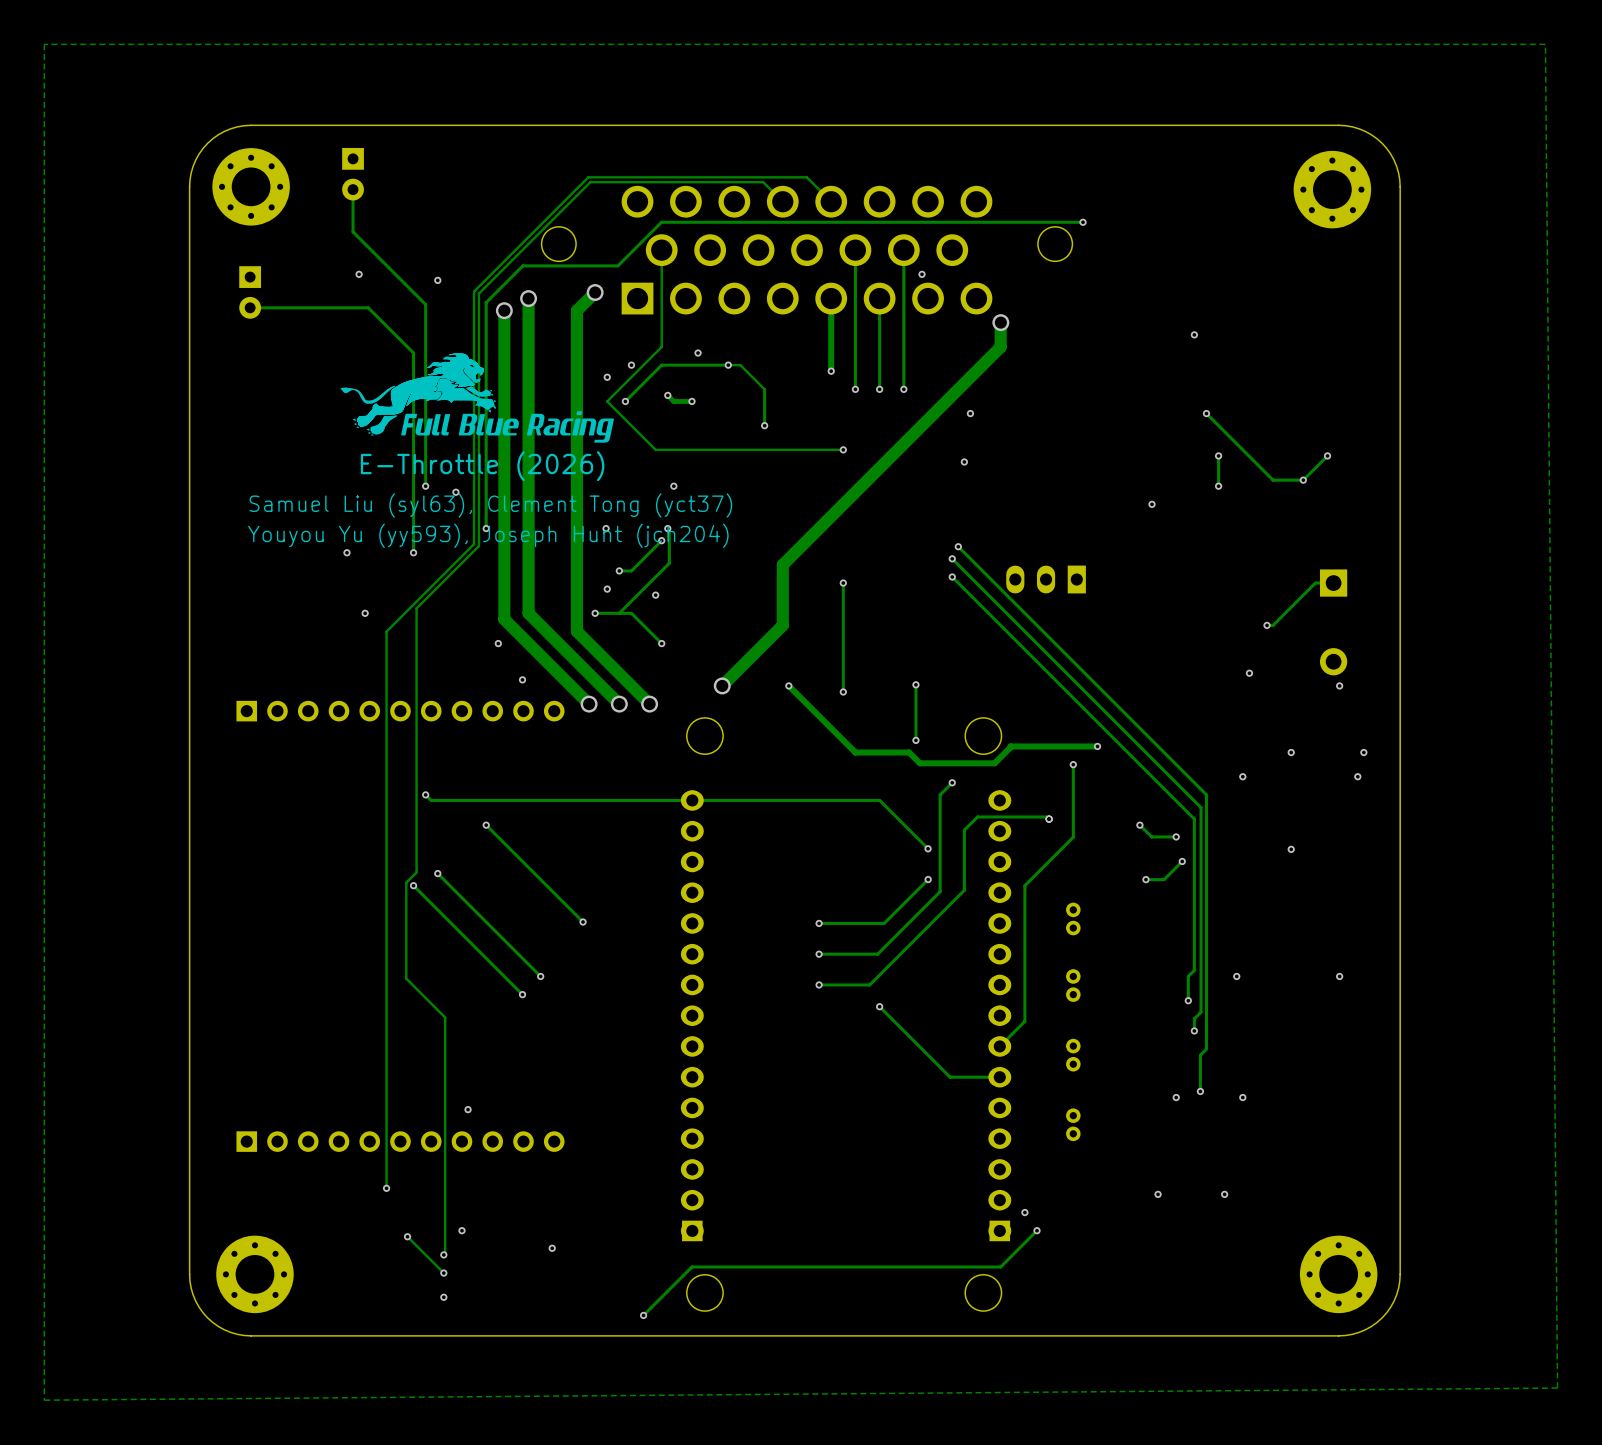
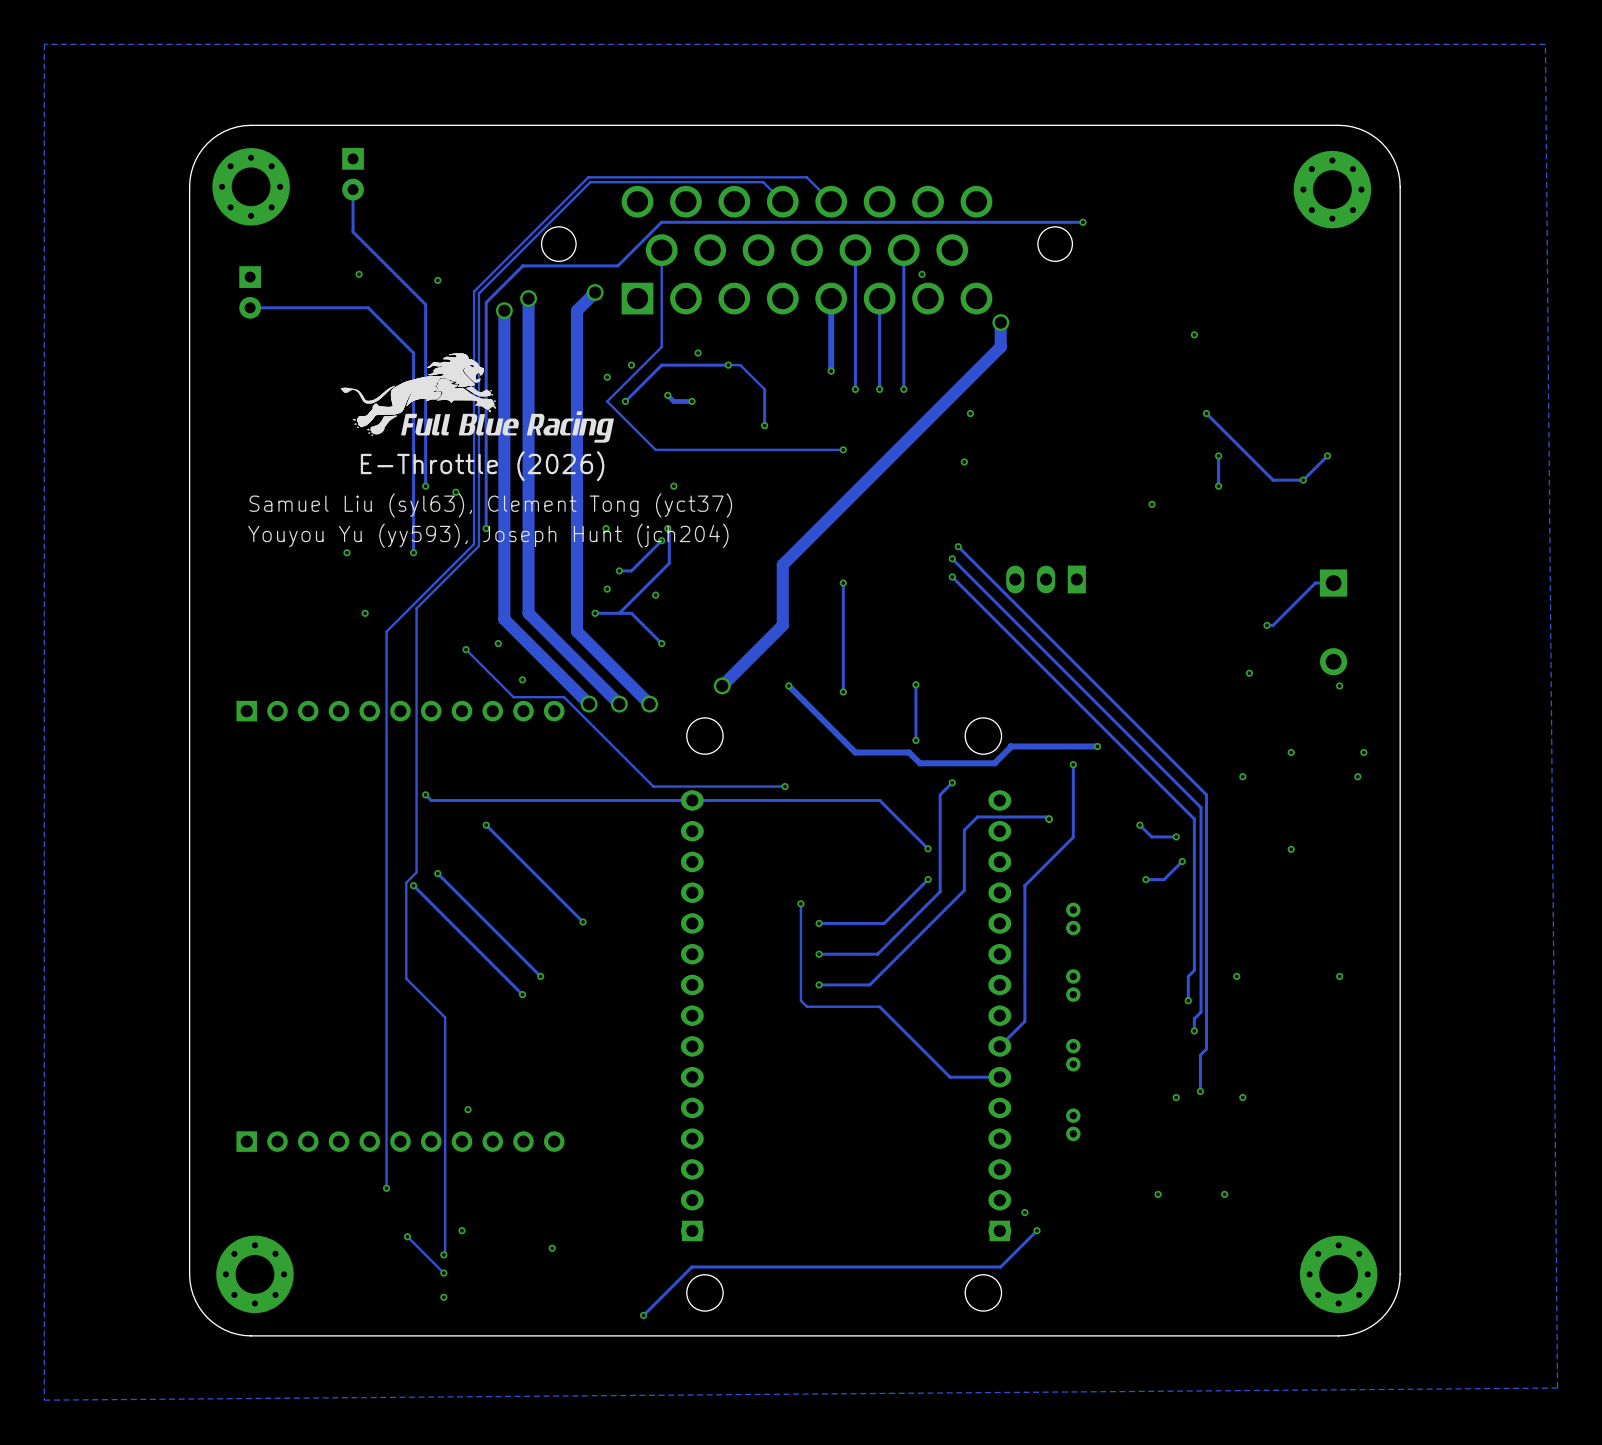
track: none -> (466, 649) (513, 697) (564, 697) (653, 786) (785, 786)
via: none -> (466, 649)
via: none -> (785, 786)
track: none -> (800, 903) (800, 1000) (807, 1006) (879, 1006)
via: none -> (800, 903)
via: (879, 1006) -> none

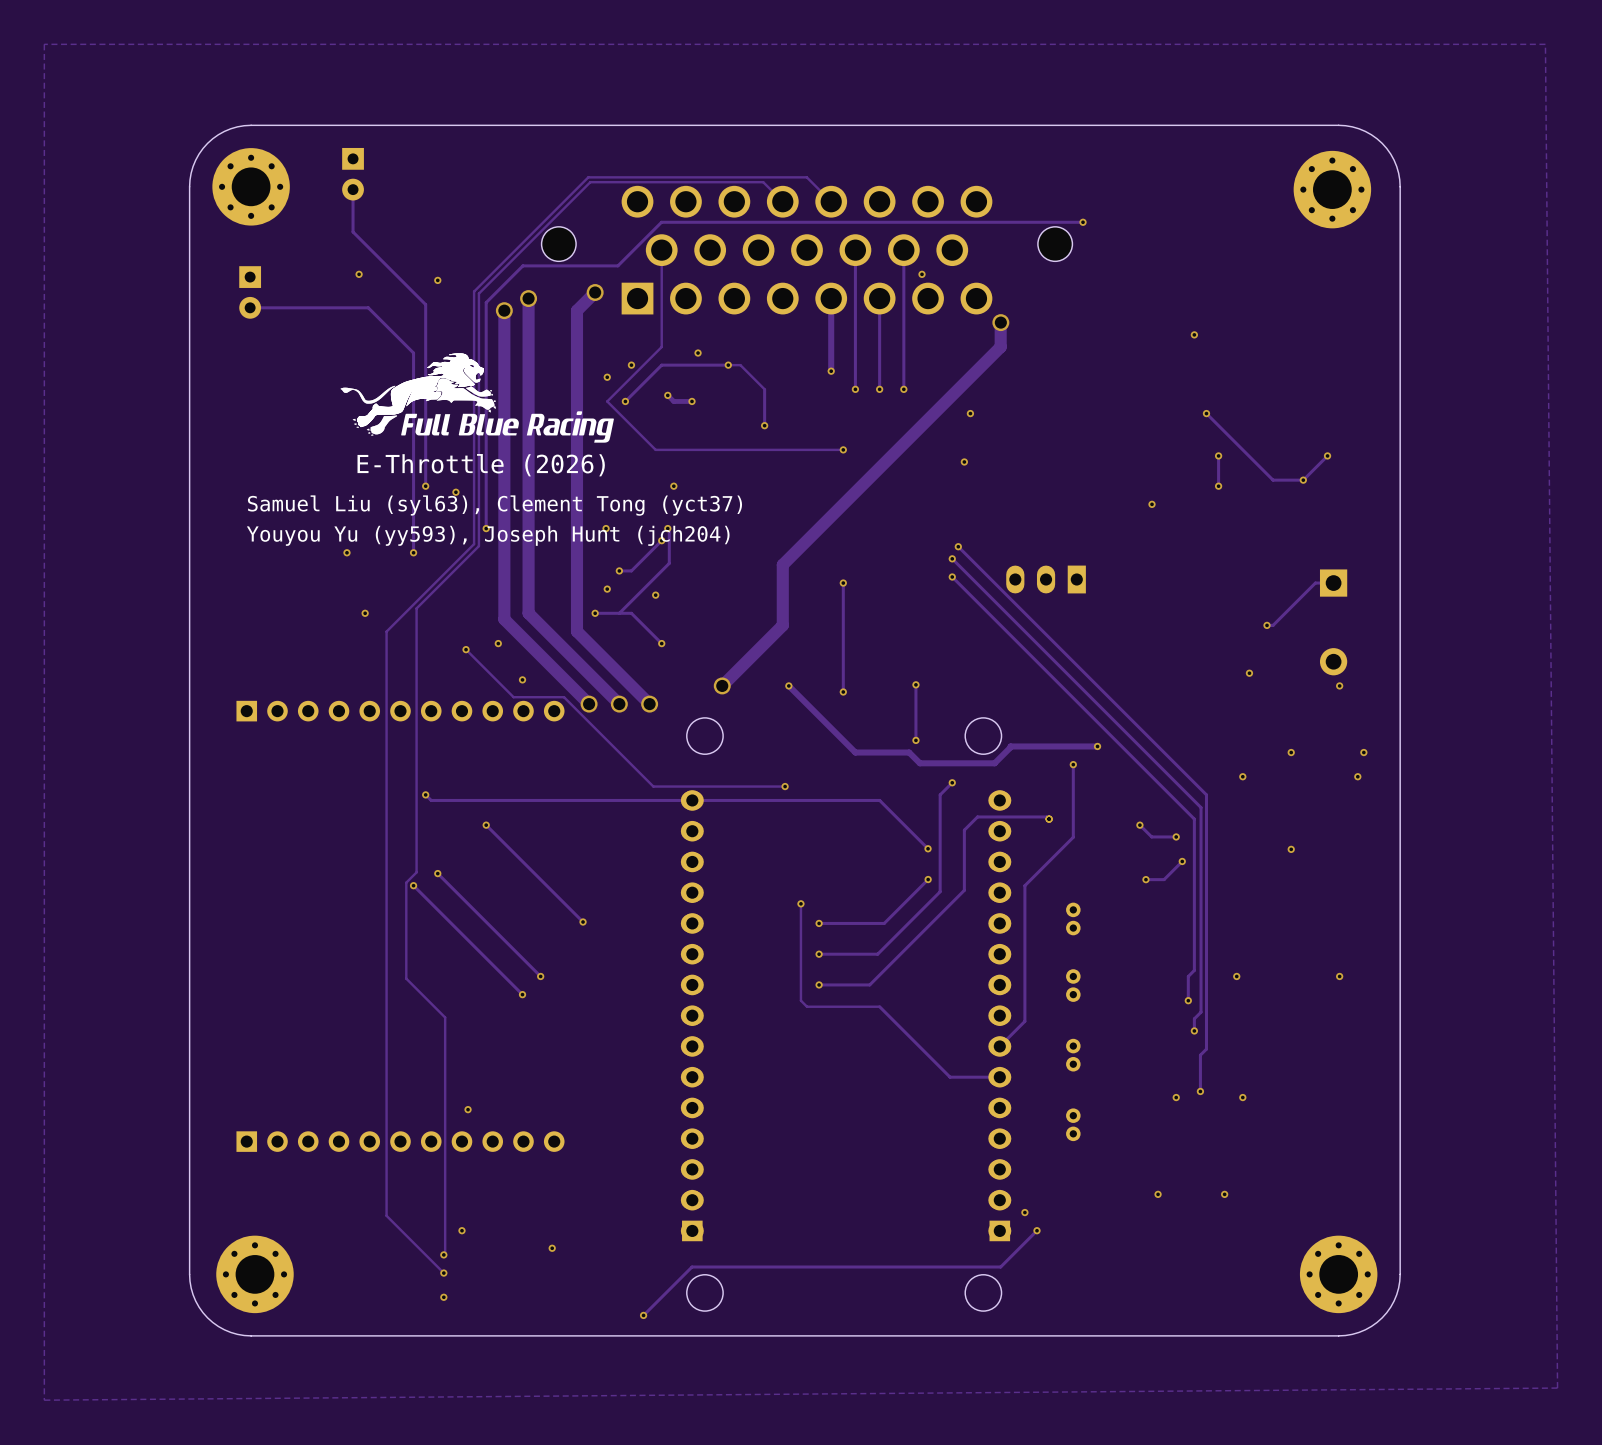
track: none -> (386, 1188) (386, 1215) (407, 1236)
via: (386, 1188) -> none
via: (407, 1236) -> none

